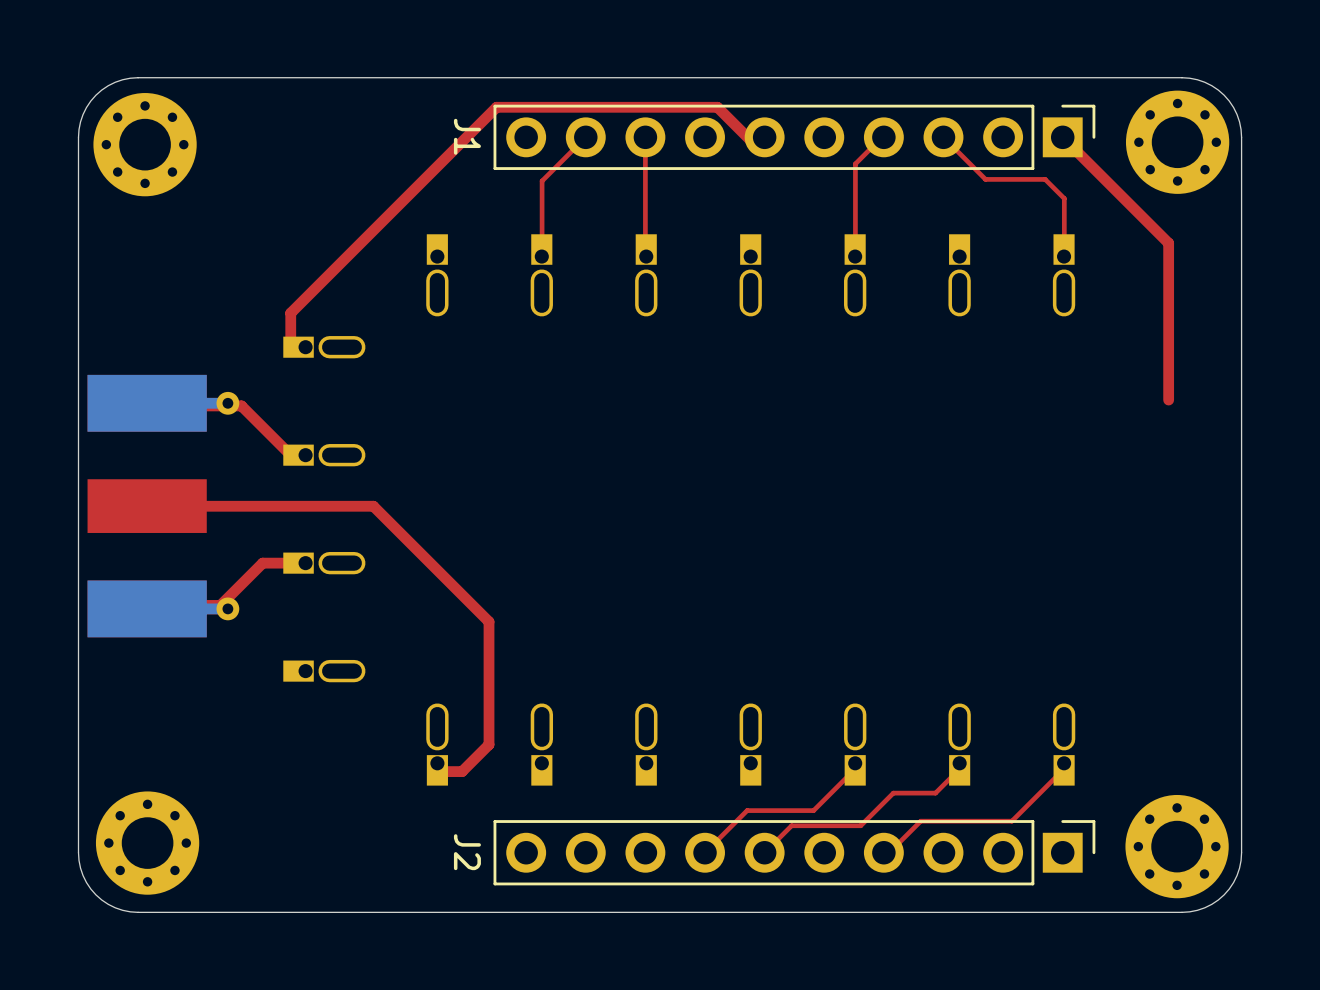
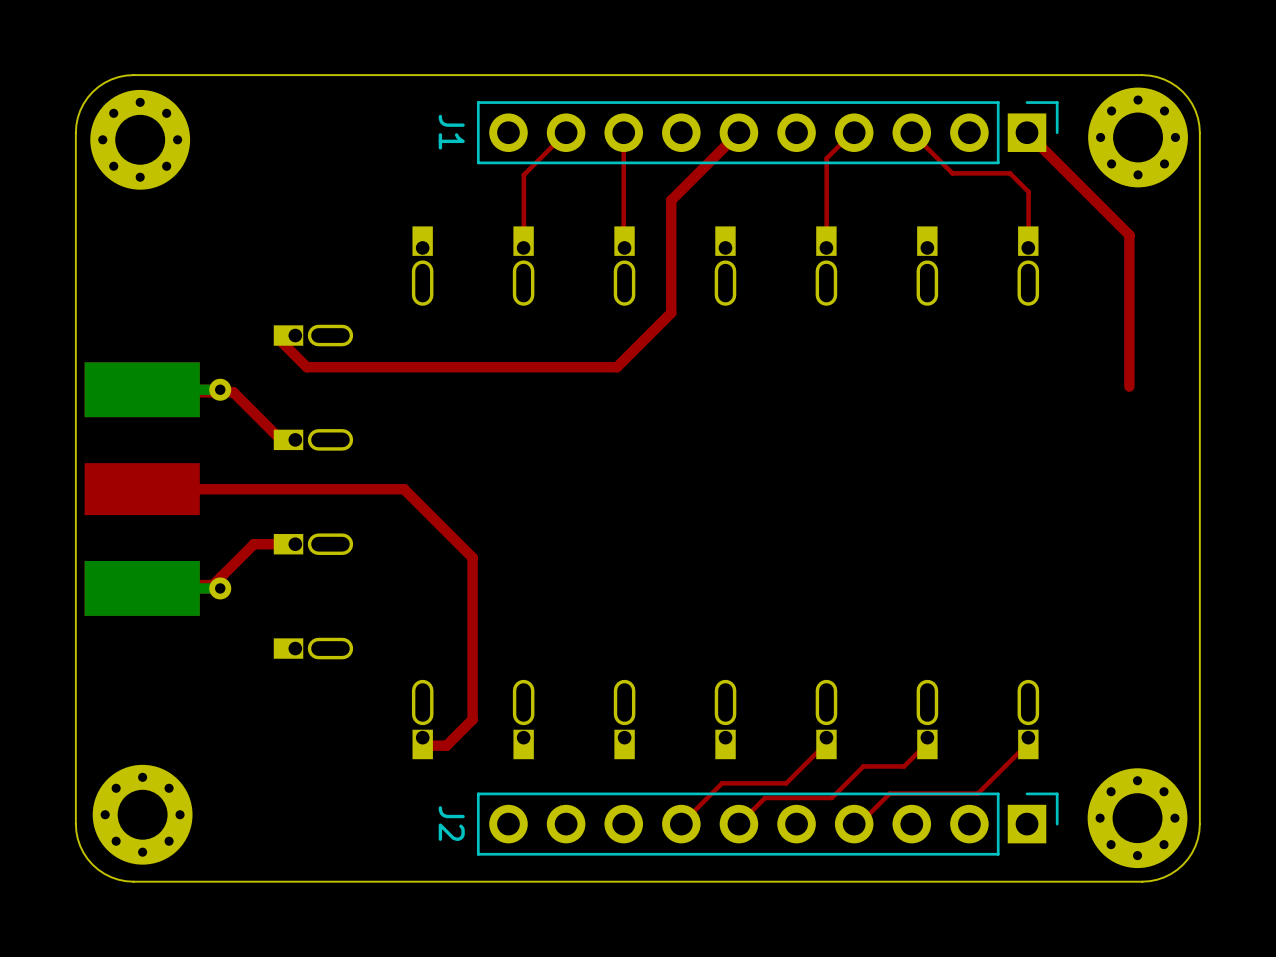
top track: (756, 145) (717, 107) (496, 107) (290, 313) (290, 347) -> (730, 140) (671, 200) (671, 312) (616, 367) (306, 367) (280, 341) (280, 335)
top track: (373, 506) (489, 621) -> (360, 489) (404, 489) (472, 557) (472, 600)

